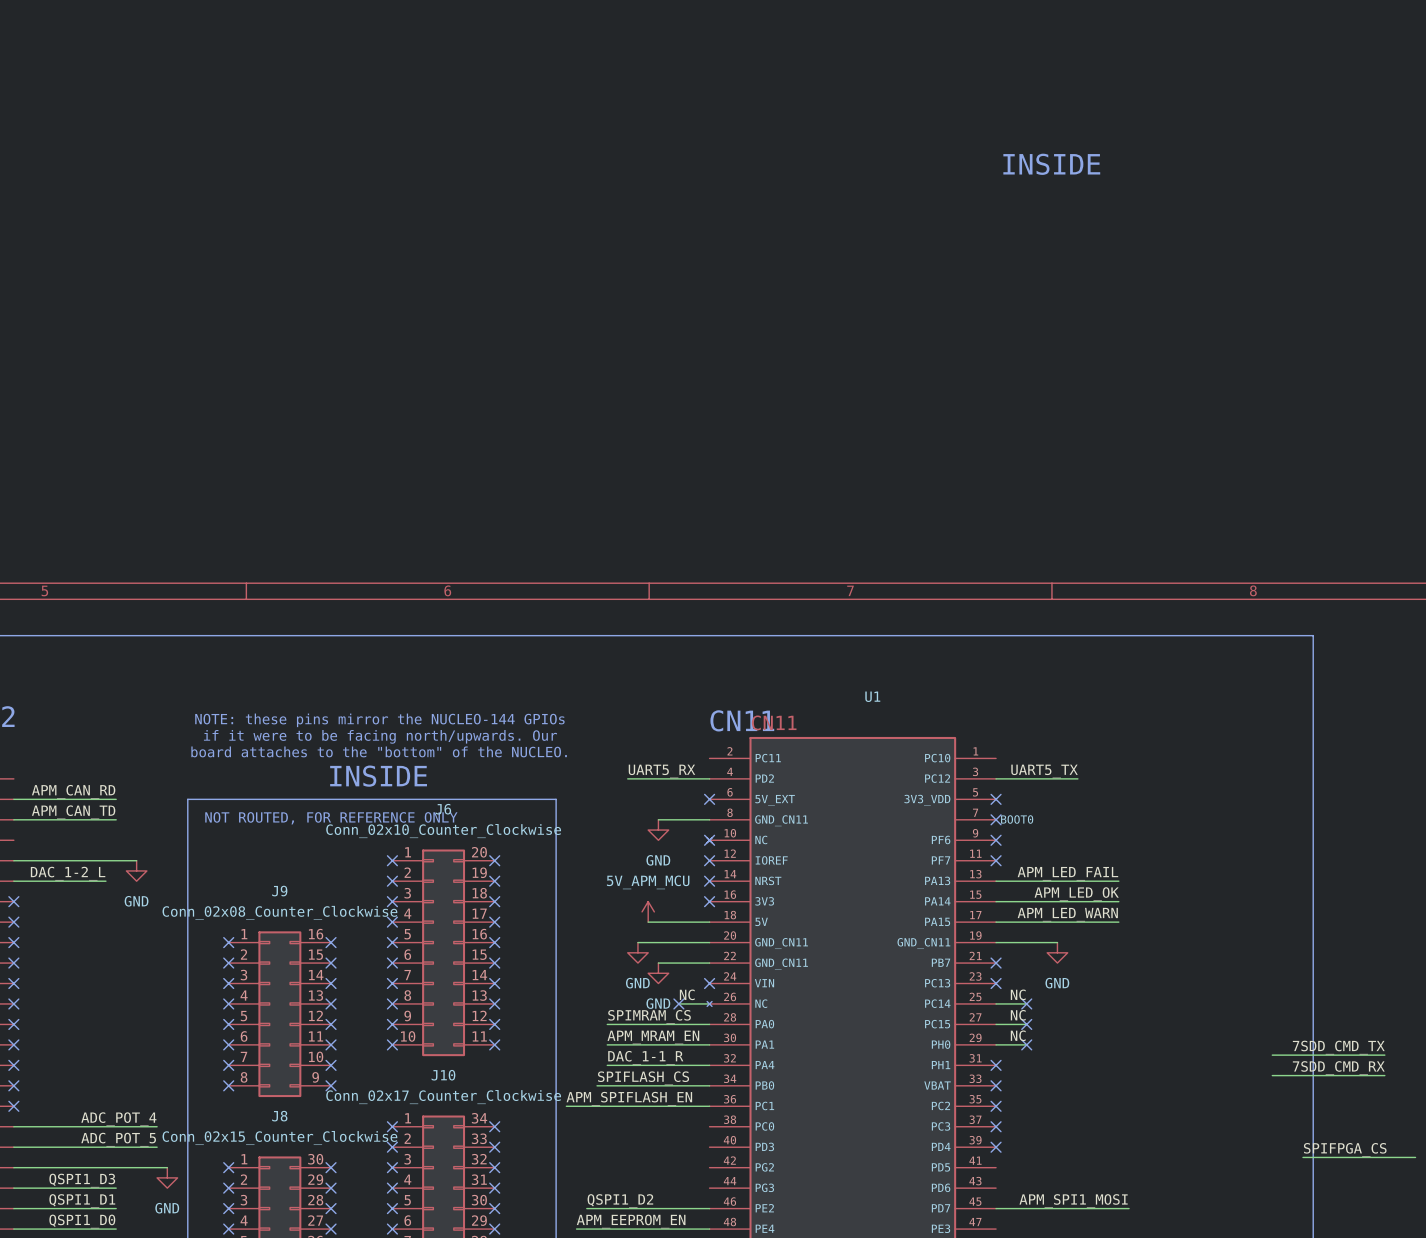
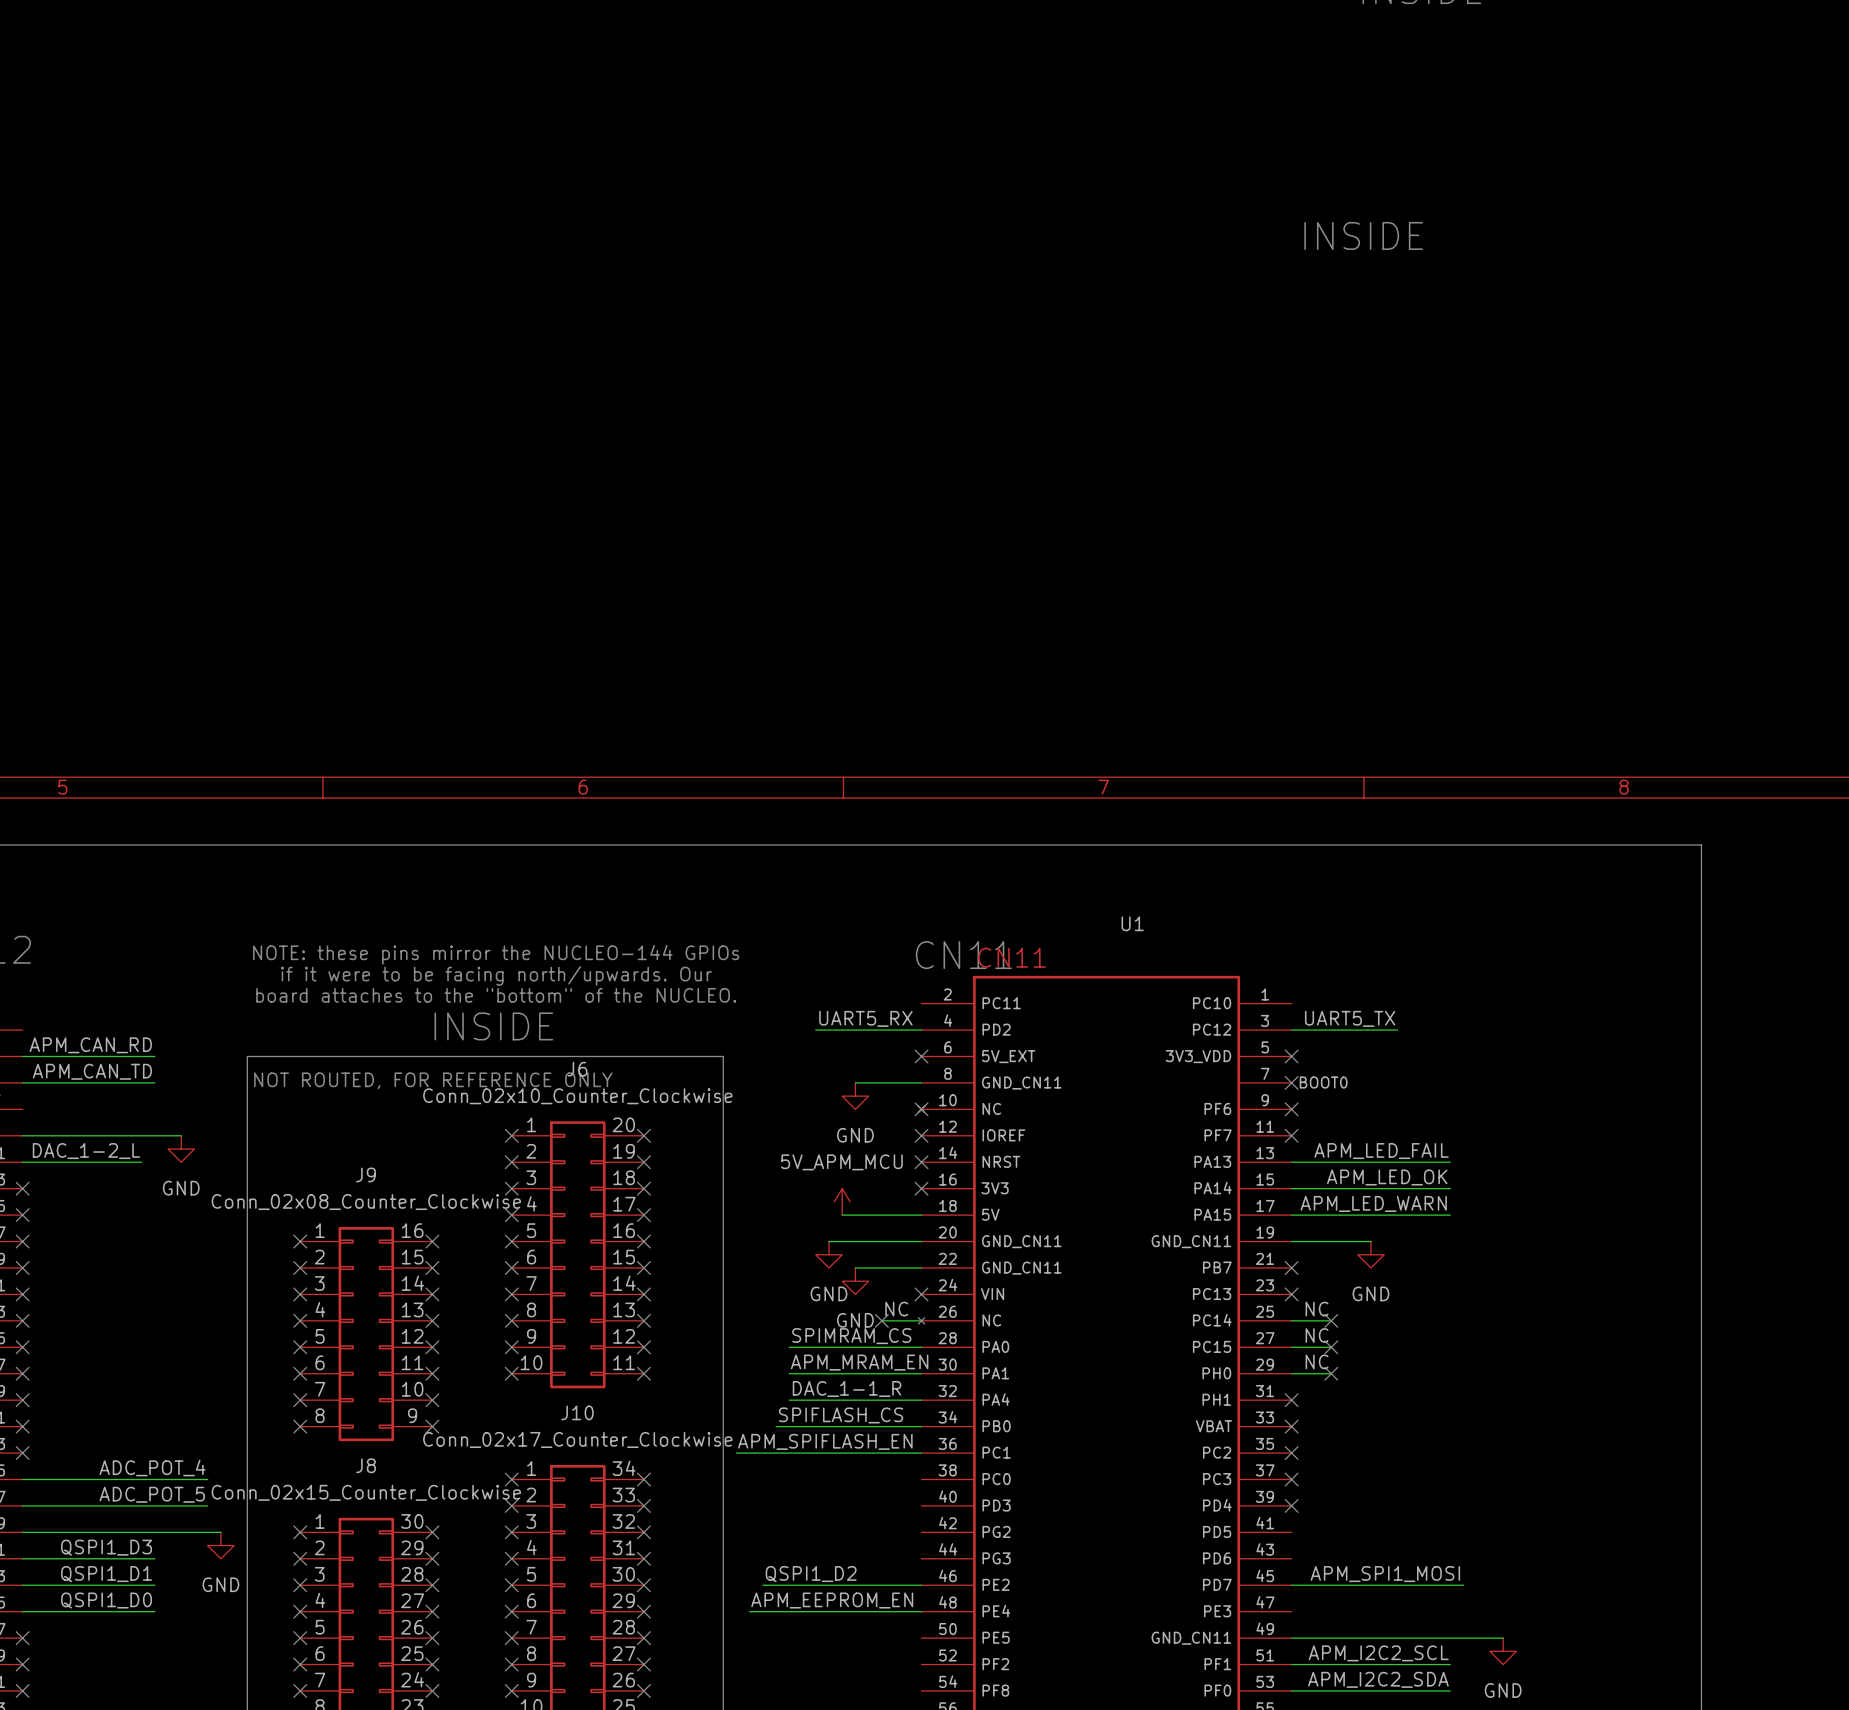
label: 7SDD_CMD_TX (1338, 1047) -> none
wire: (1272, 1055) (1384, 1055) -> none
label: 7SDD_CMD_RX (1338, 1068) -> none
wire: (1272, 1075) (1384, 1075) -> none
label: SPIFPGA_CS (1345, 1149) -> none
wire: (1302, 1157) (1415, 1157) -> none

